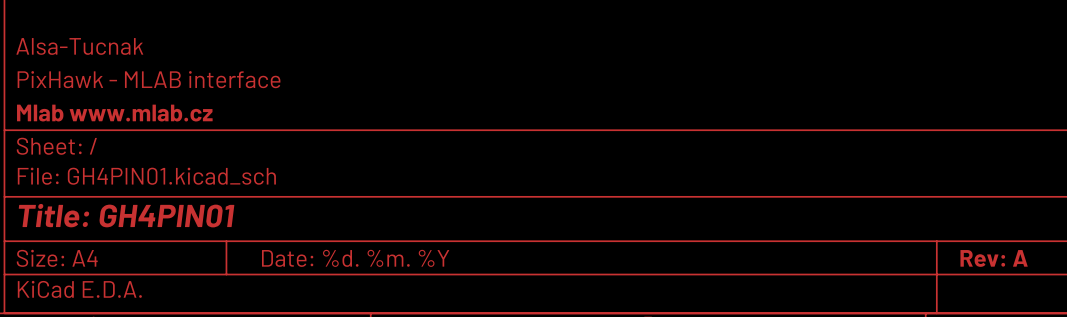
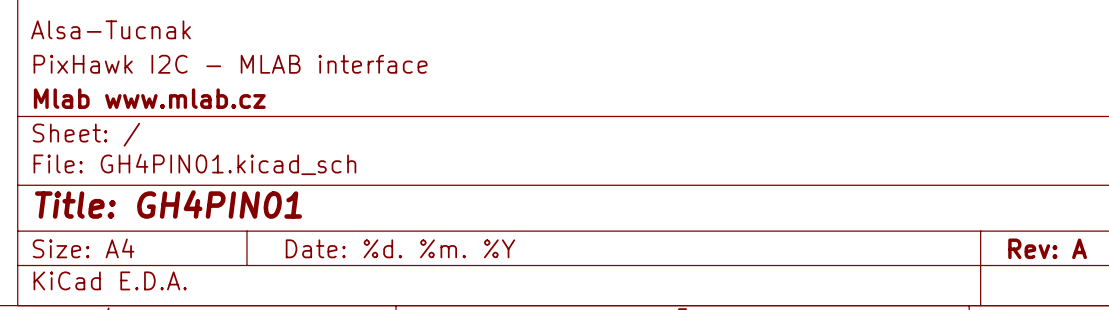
title block: PixHawk - MLAB interface (149, 79) -> PixHawk I2C - MLAB interface (230, 64)

